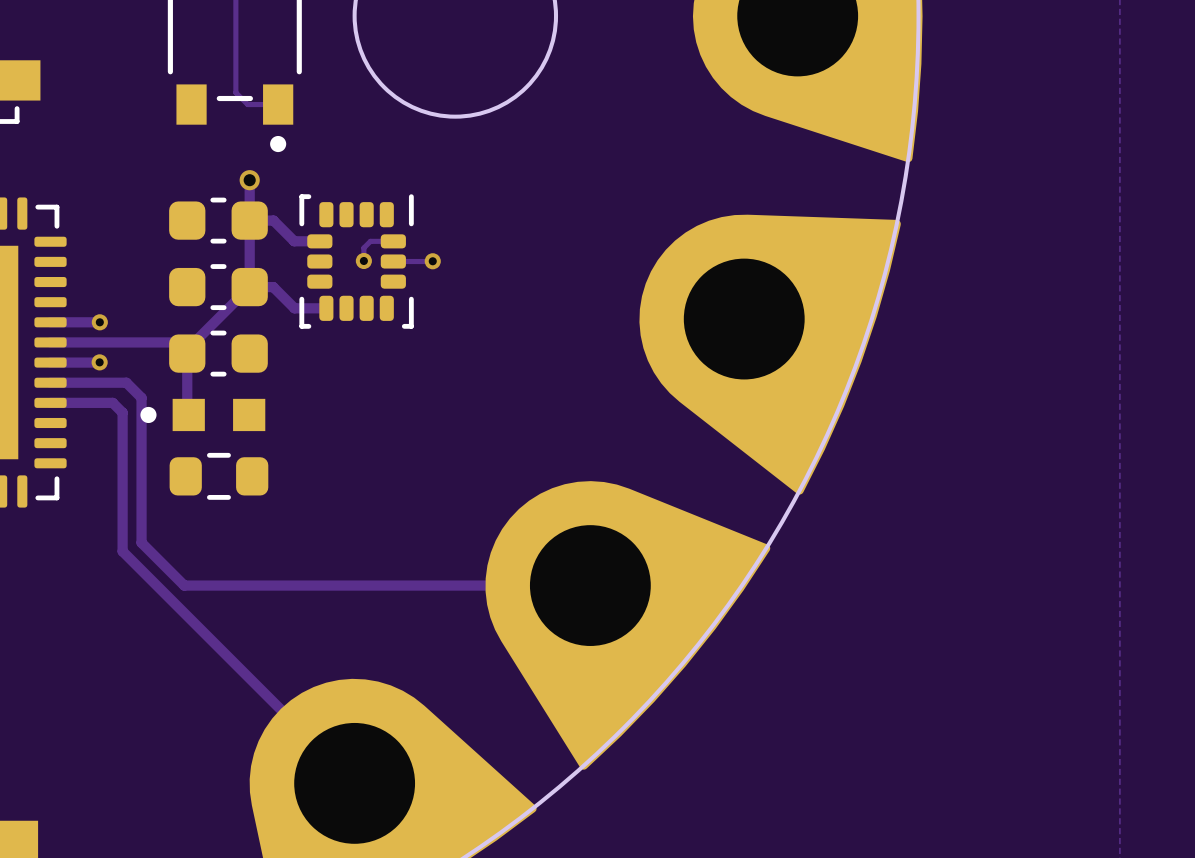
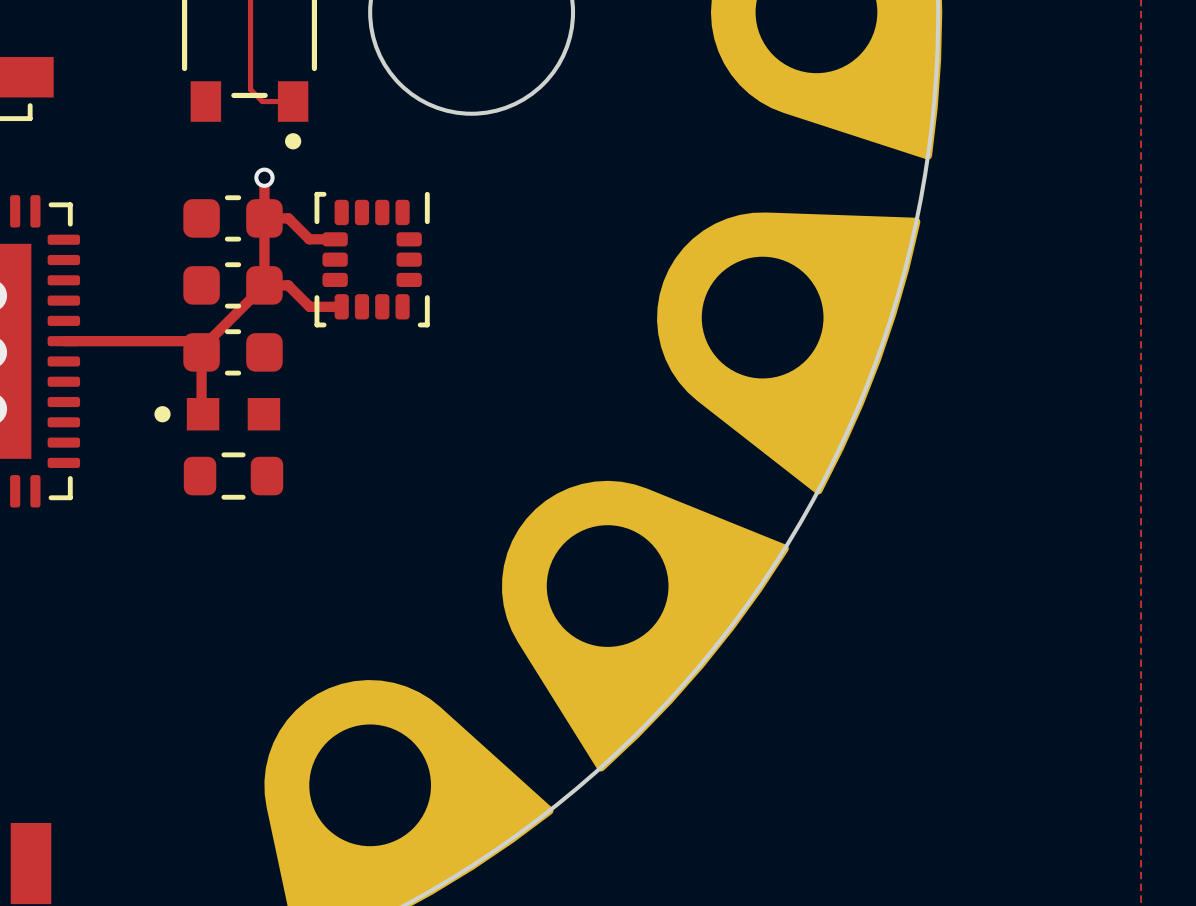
track: (393, 241) (370, 241) (363, 247) (363, 260) -> none
via: (363, 260) -> none
track: (393, 261) (432, 261) -> none
via: (432, 261) -> none
track: (50, 322) (99, 322) -> none
via: (99, 322) -> none
track: (50, 362) (99, 362) -> none
via: (99, 362) -> none
track: (50, 382) (126, 382) (141, 397) (141, 542) (184, 585) (590, 585) -> none
track: (50, 402) (112, 402) (122, 412) (122, 551) (354, 783) -> none

